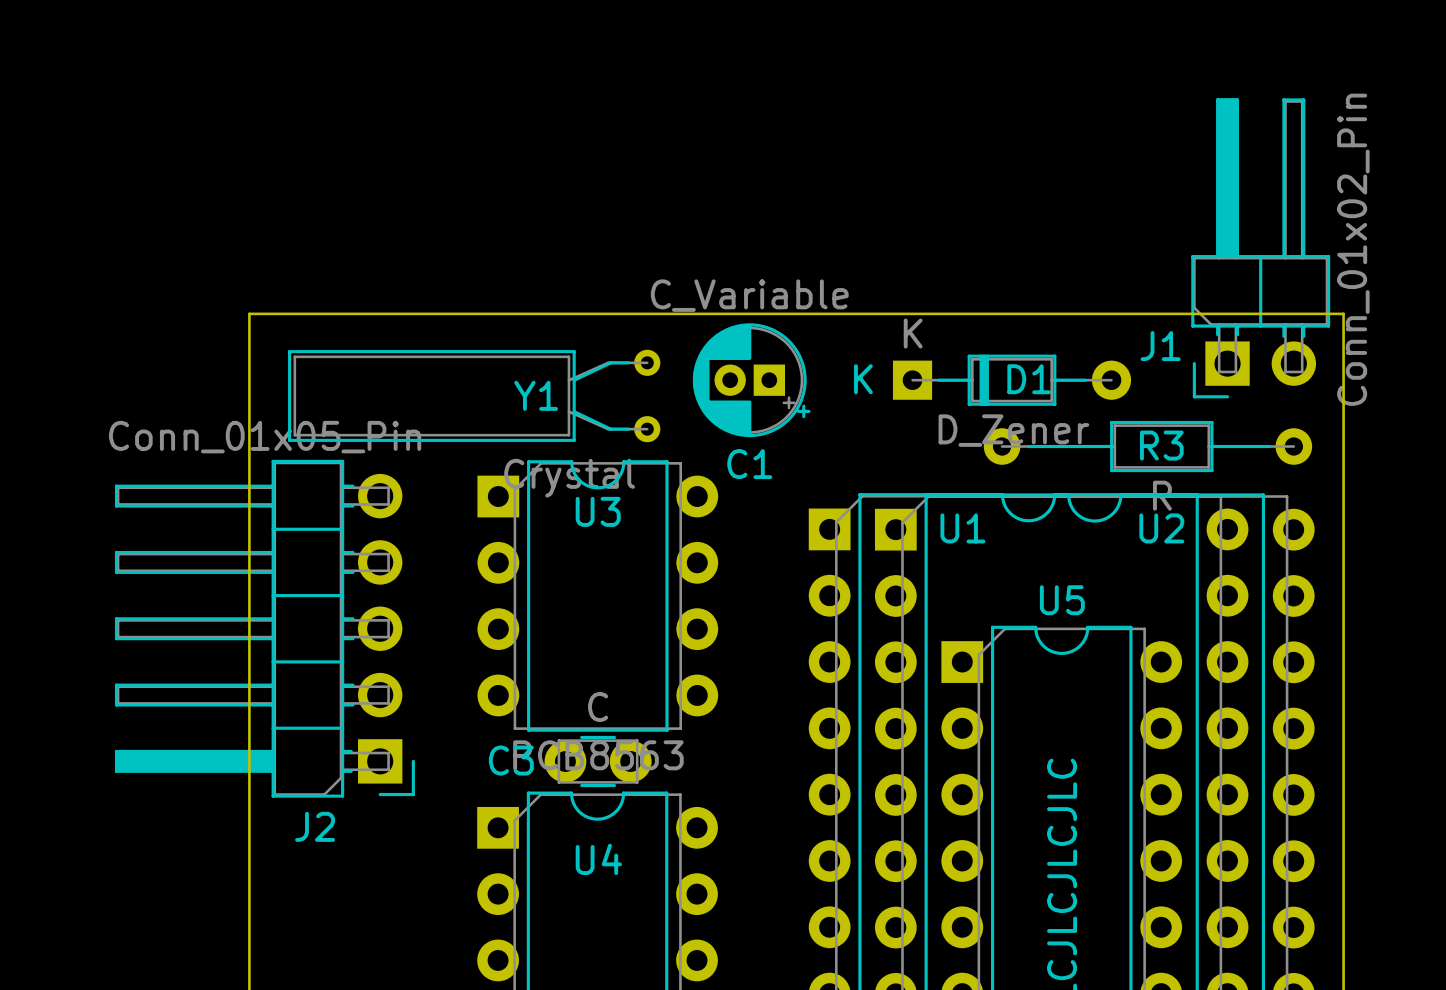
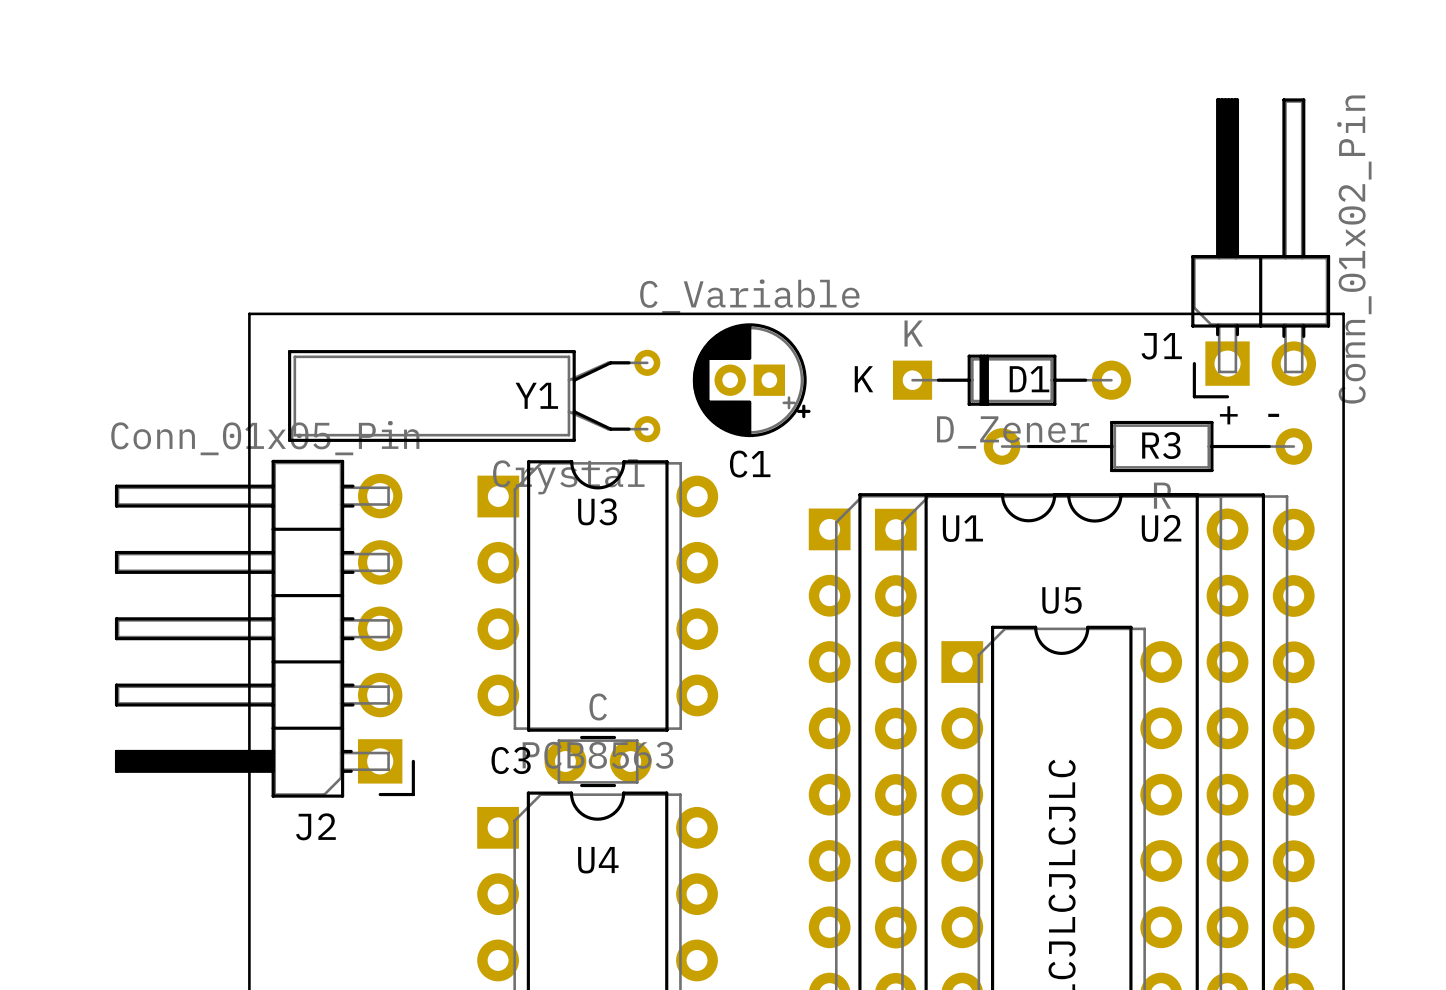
text: none -> + - (1249, 415)

